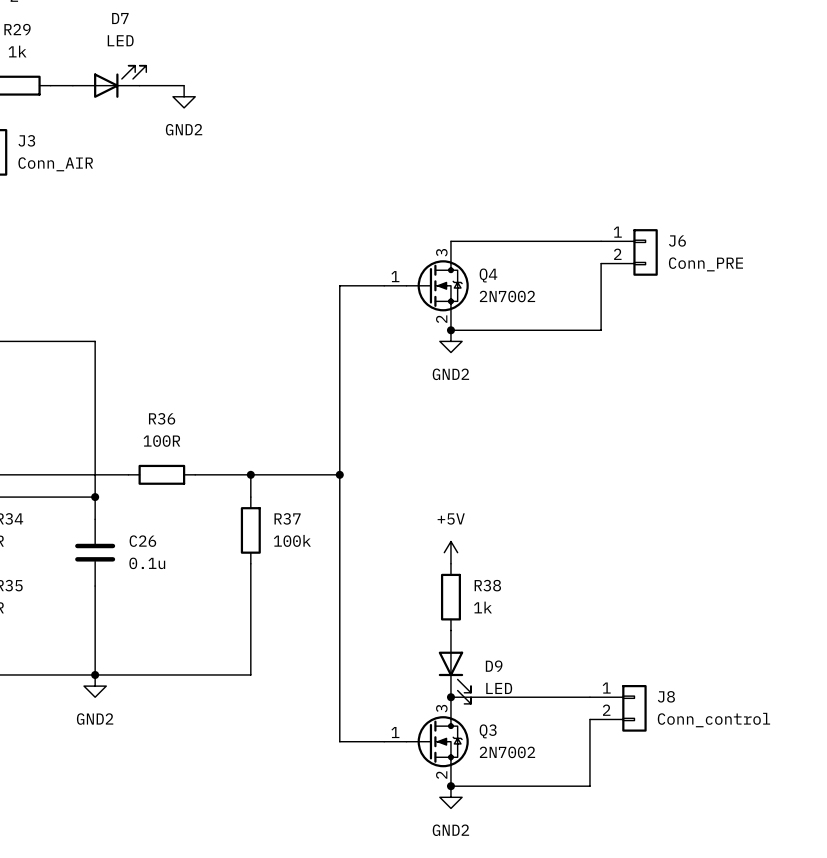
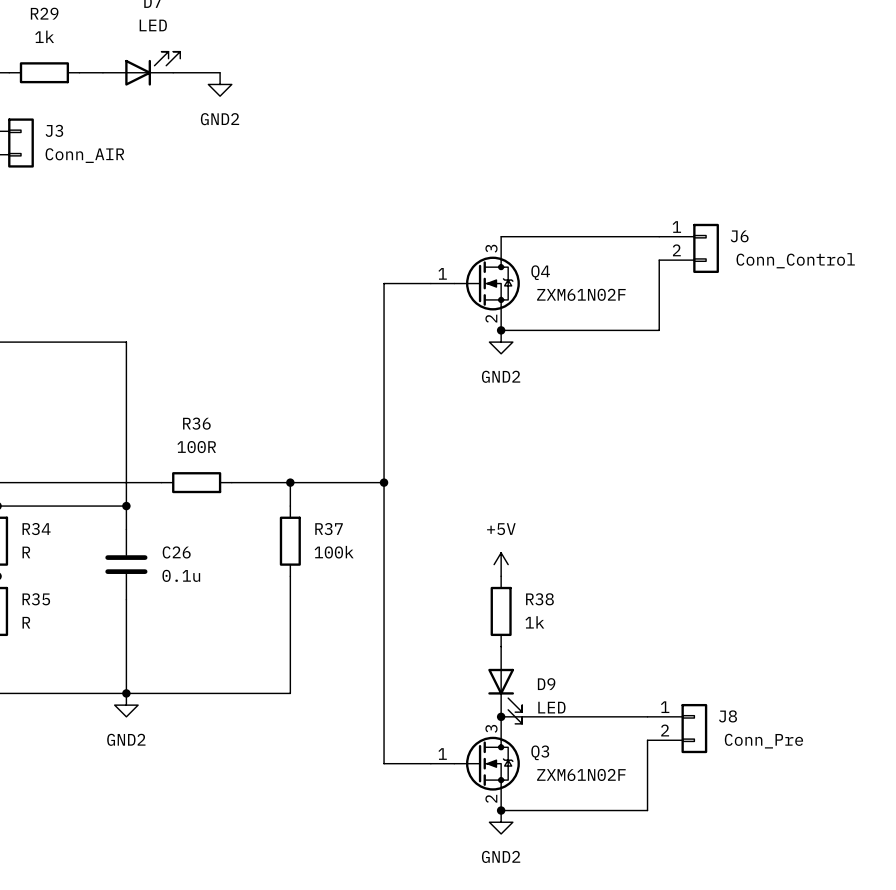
J6 value: Conn_PRE (705, 264) -> Conn_Control (795, 260)
Q4 value: 2N7002 (507, 296) -> ZXM61N02F (581, 294)
J8 value: Conn_control (713, 720) -> Conn_Pre (763, 741)
Q3 value: 2N7002 (507, 752) -> ZXM61N02F (581, 774)

